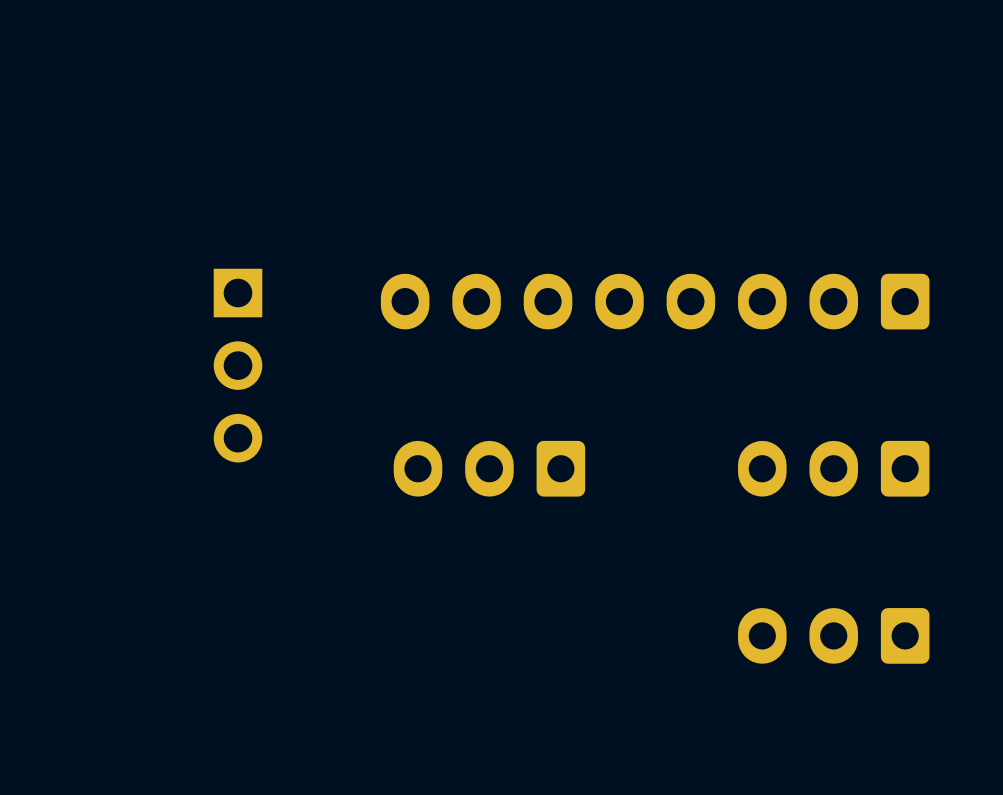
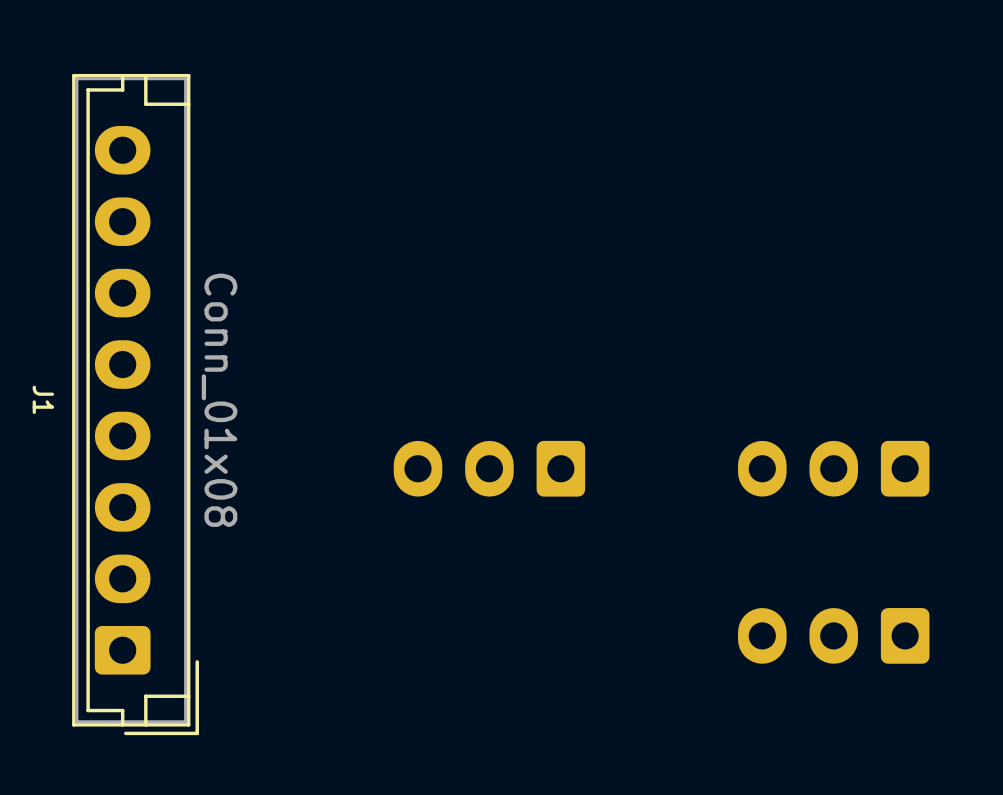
J1 side: top (655, 301) -> bottom (135, 404)
part: (238, 365) -> none

